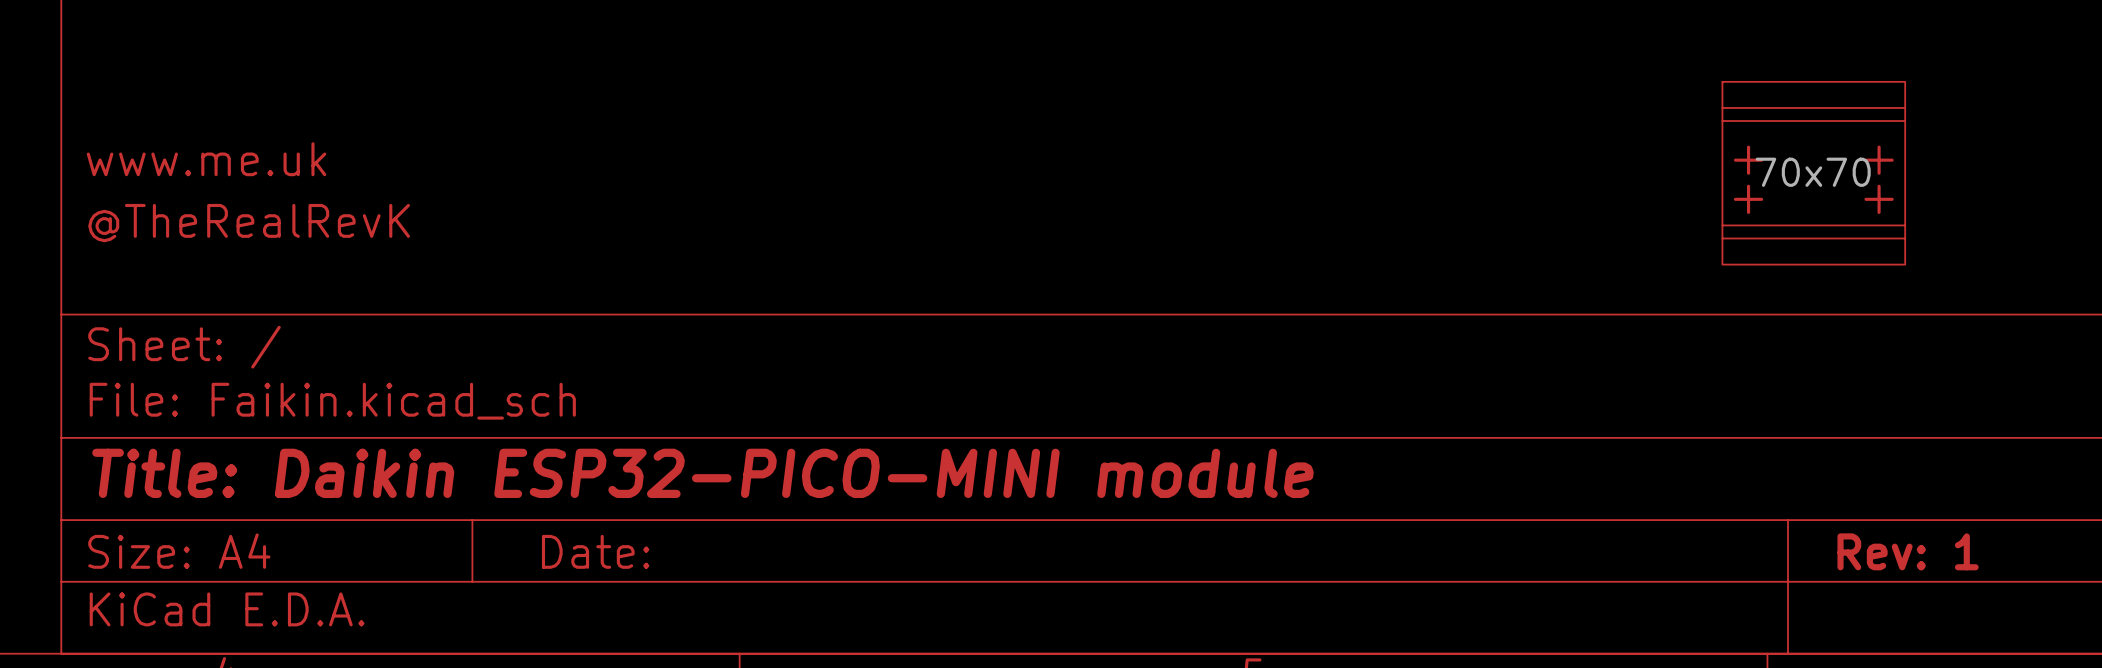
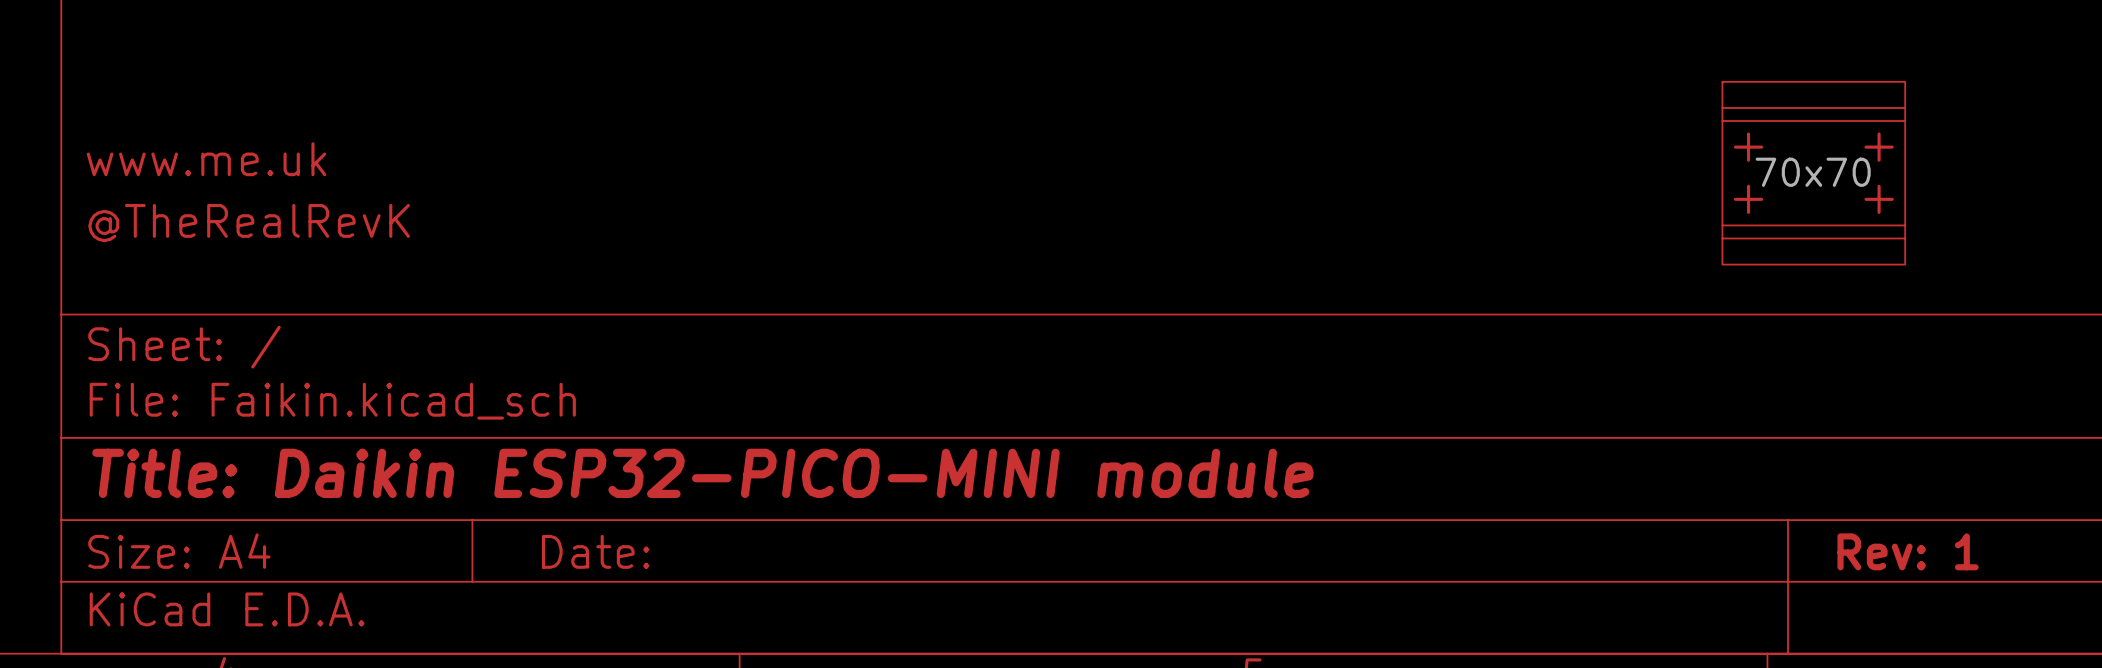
part position: (1748, 160) -> (1748, 147)
part position: (1879, 160) -> (1879, 147)

